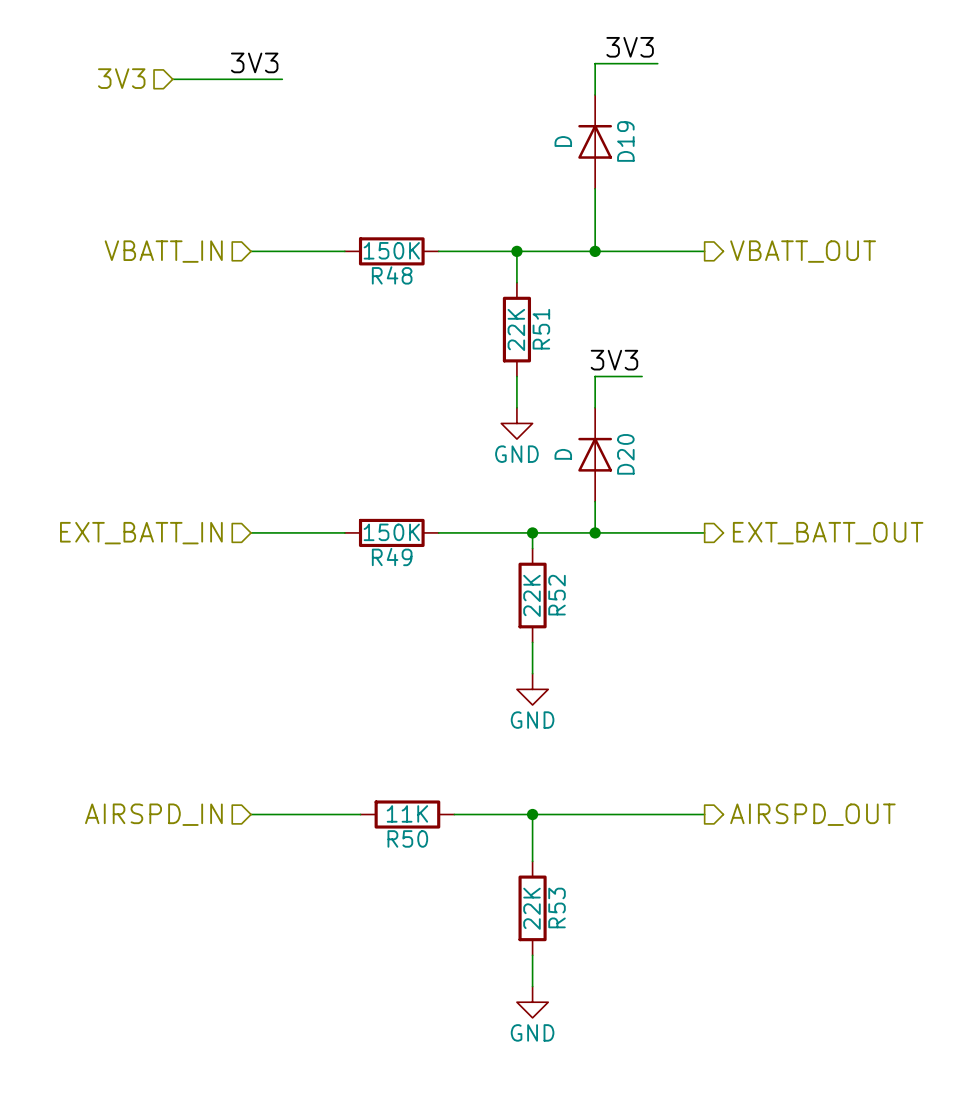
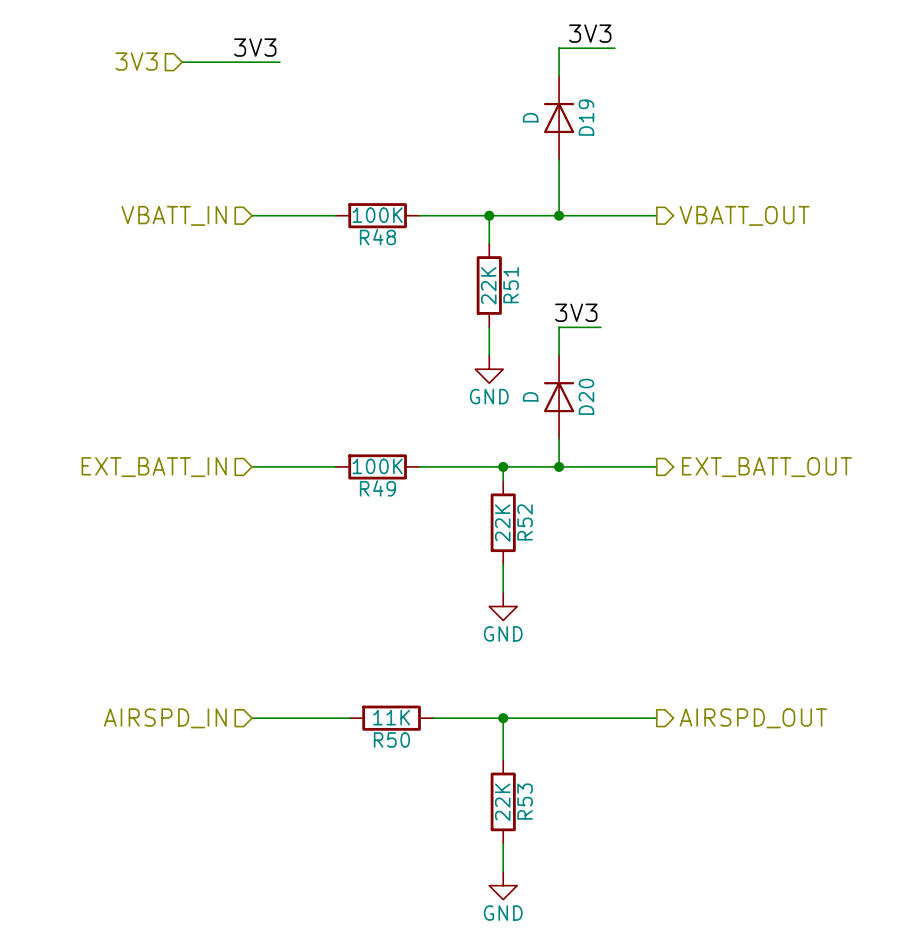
R48 value: 150K (391, 250) -> 100K (377, 215)
R49 value: 150K (391, 532) -> 100K (377, 466)

